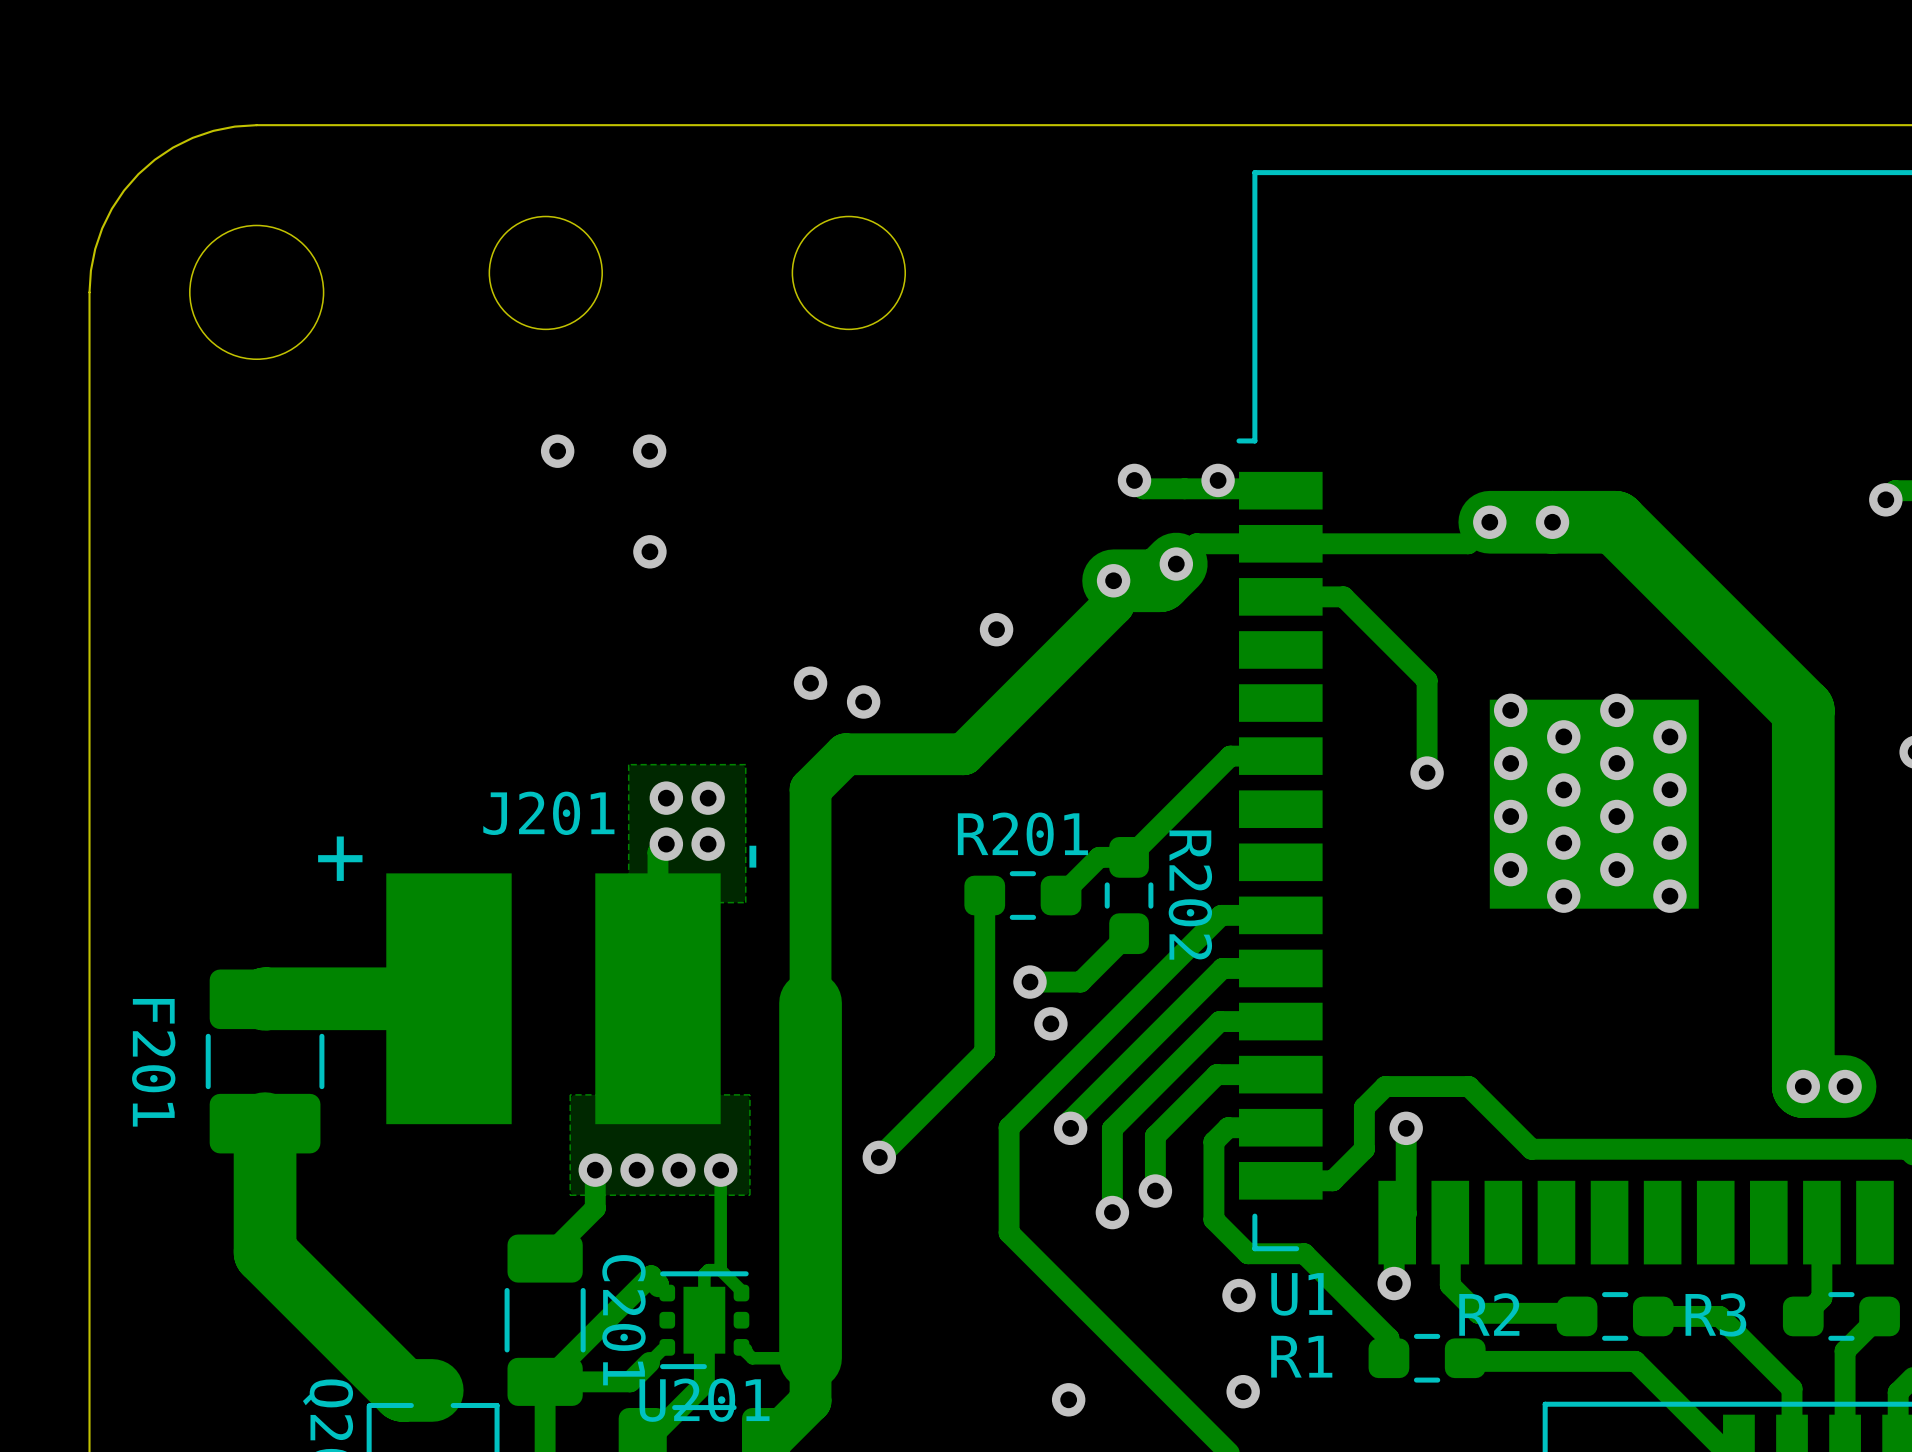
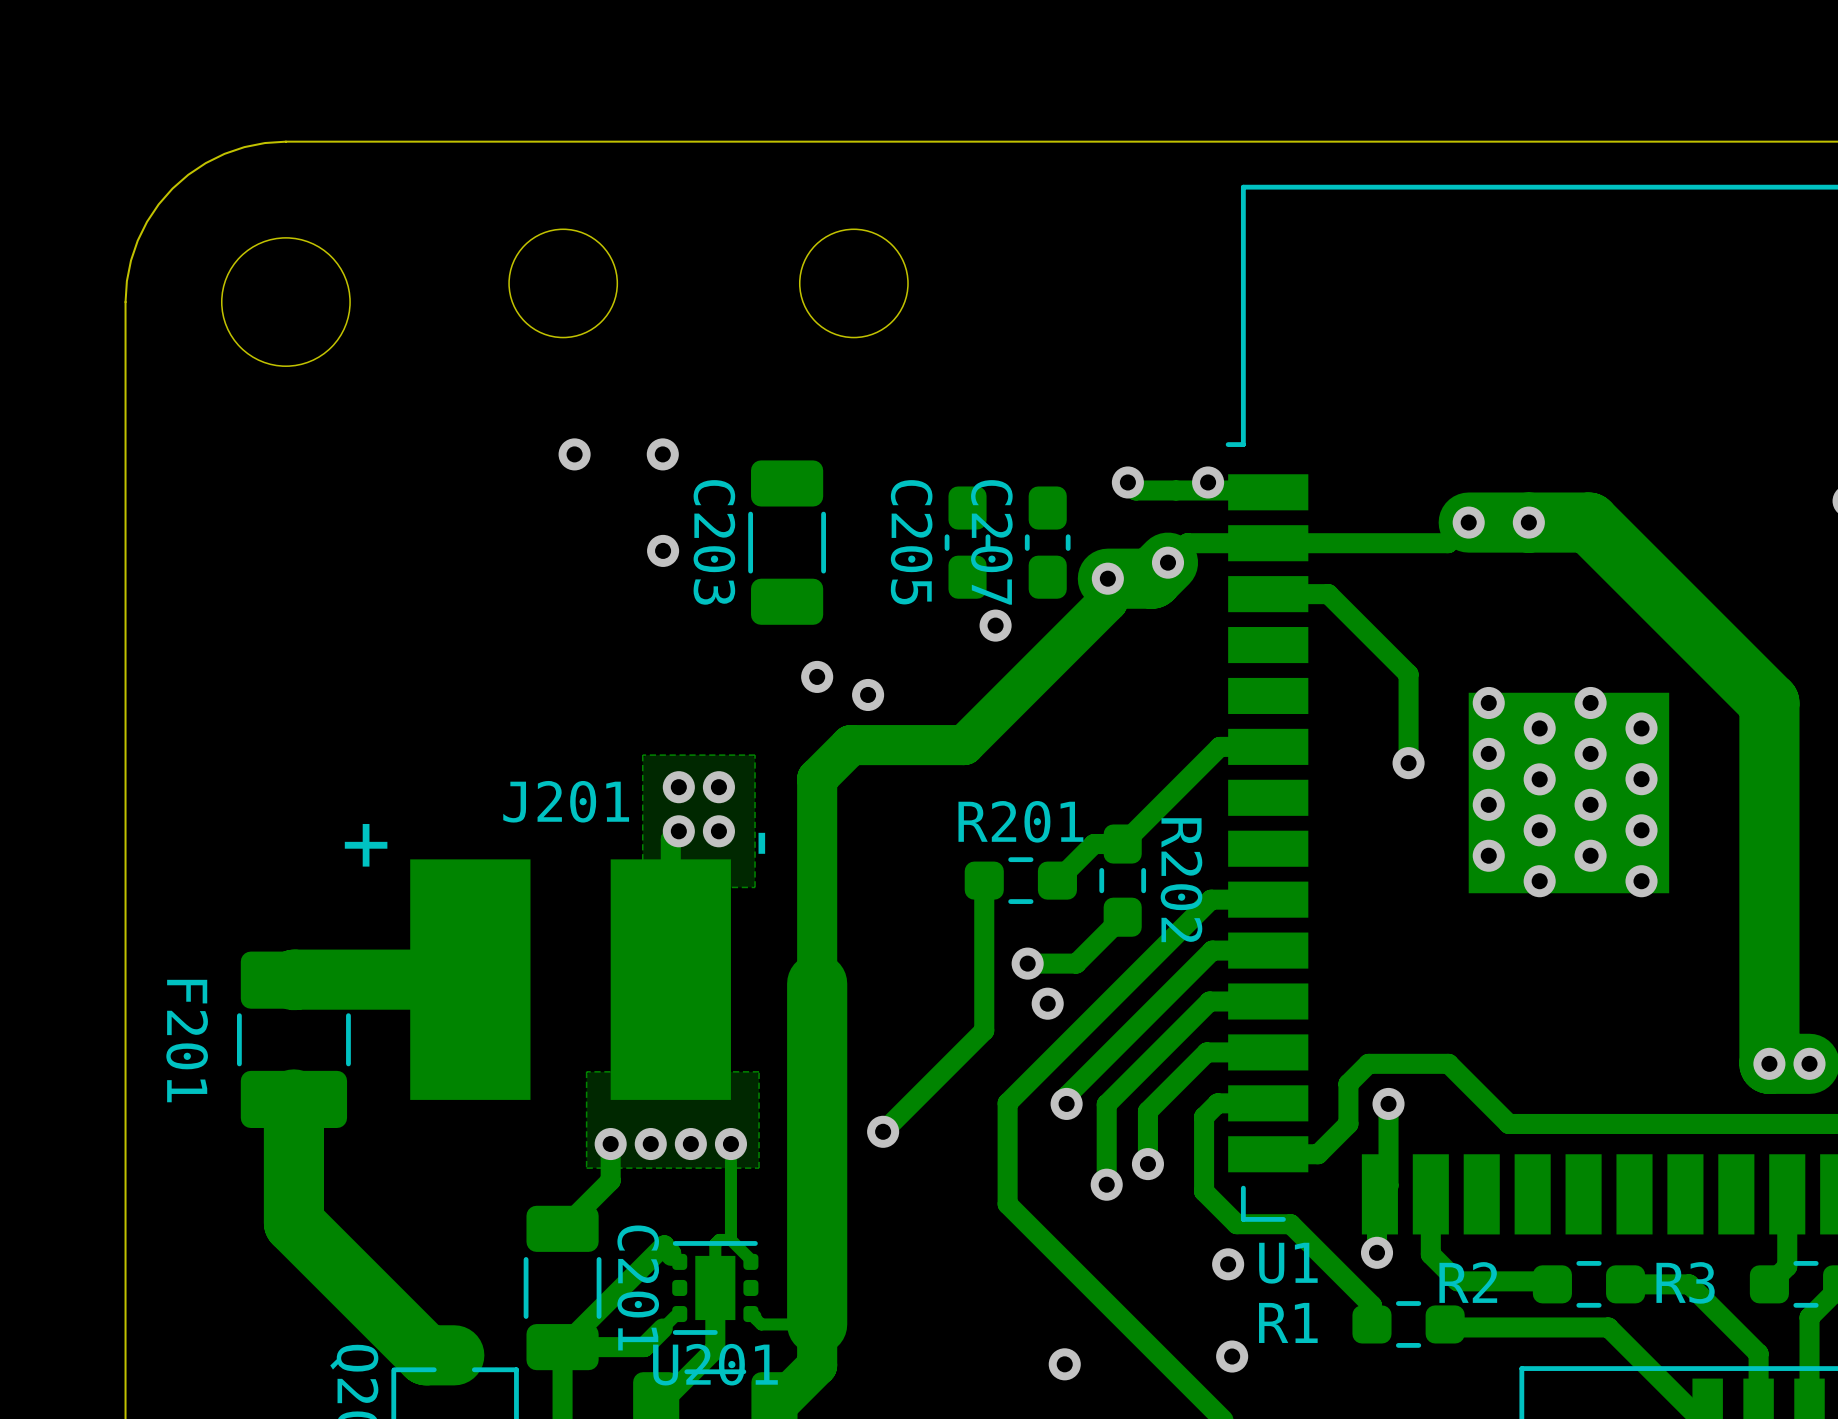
C203: none -> (787, 542)
C205: none -> (967, 542)
C207: none -> (1047, 542)

